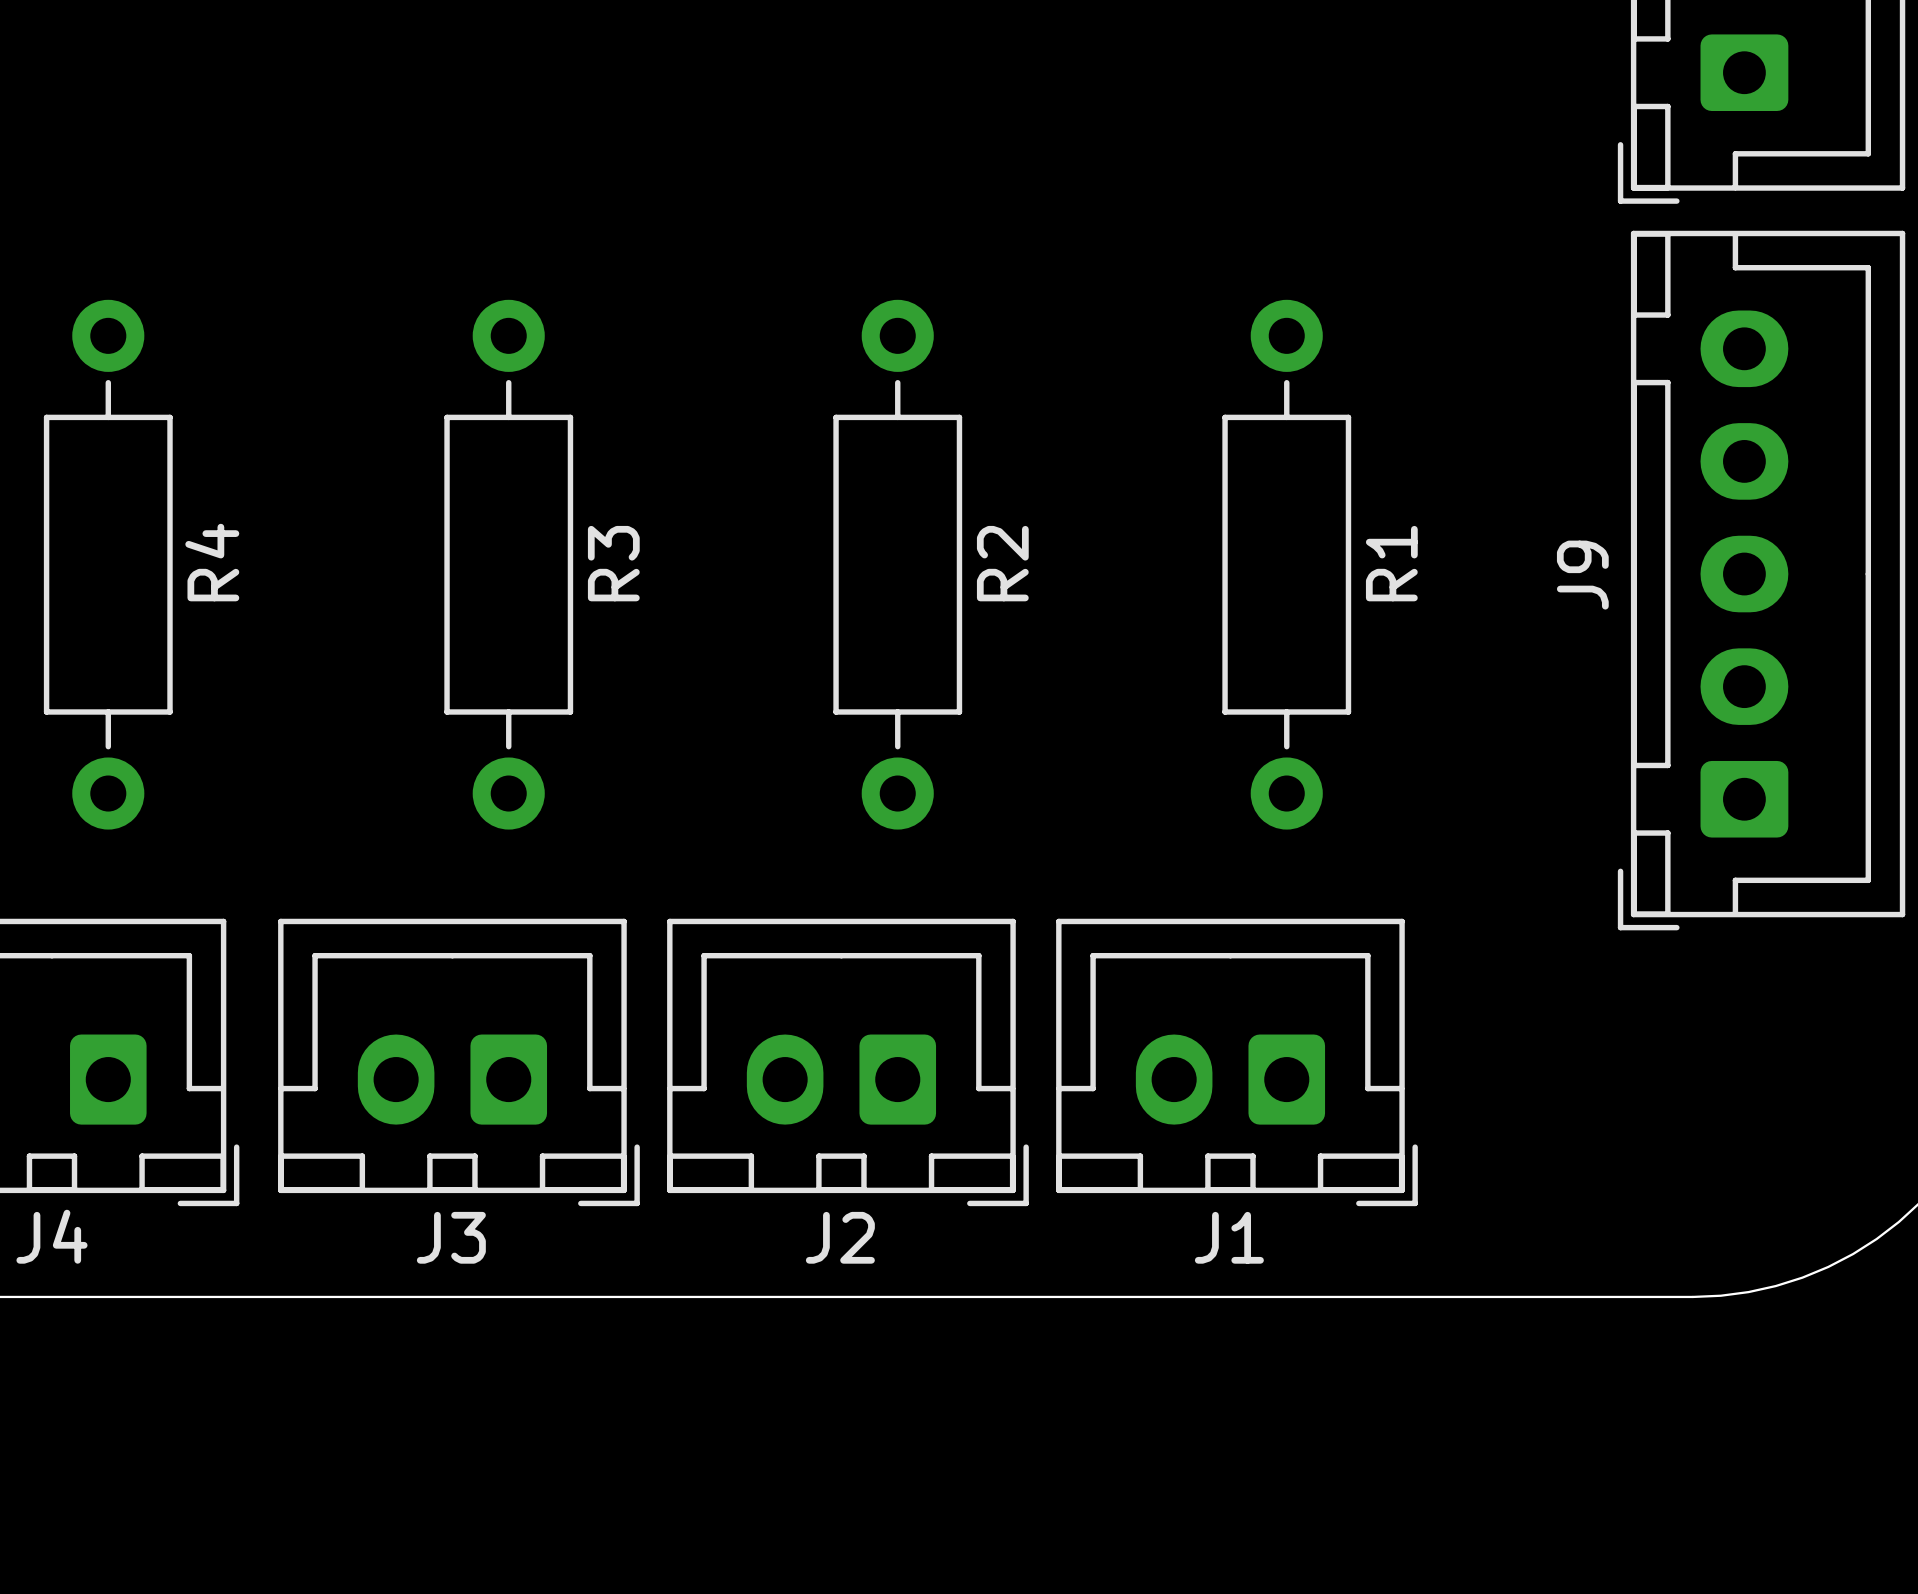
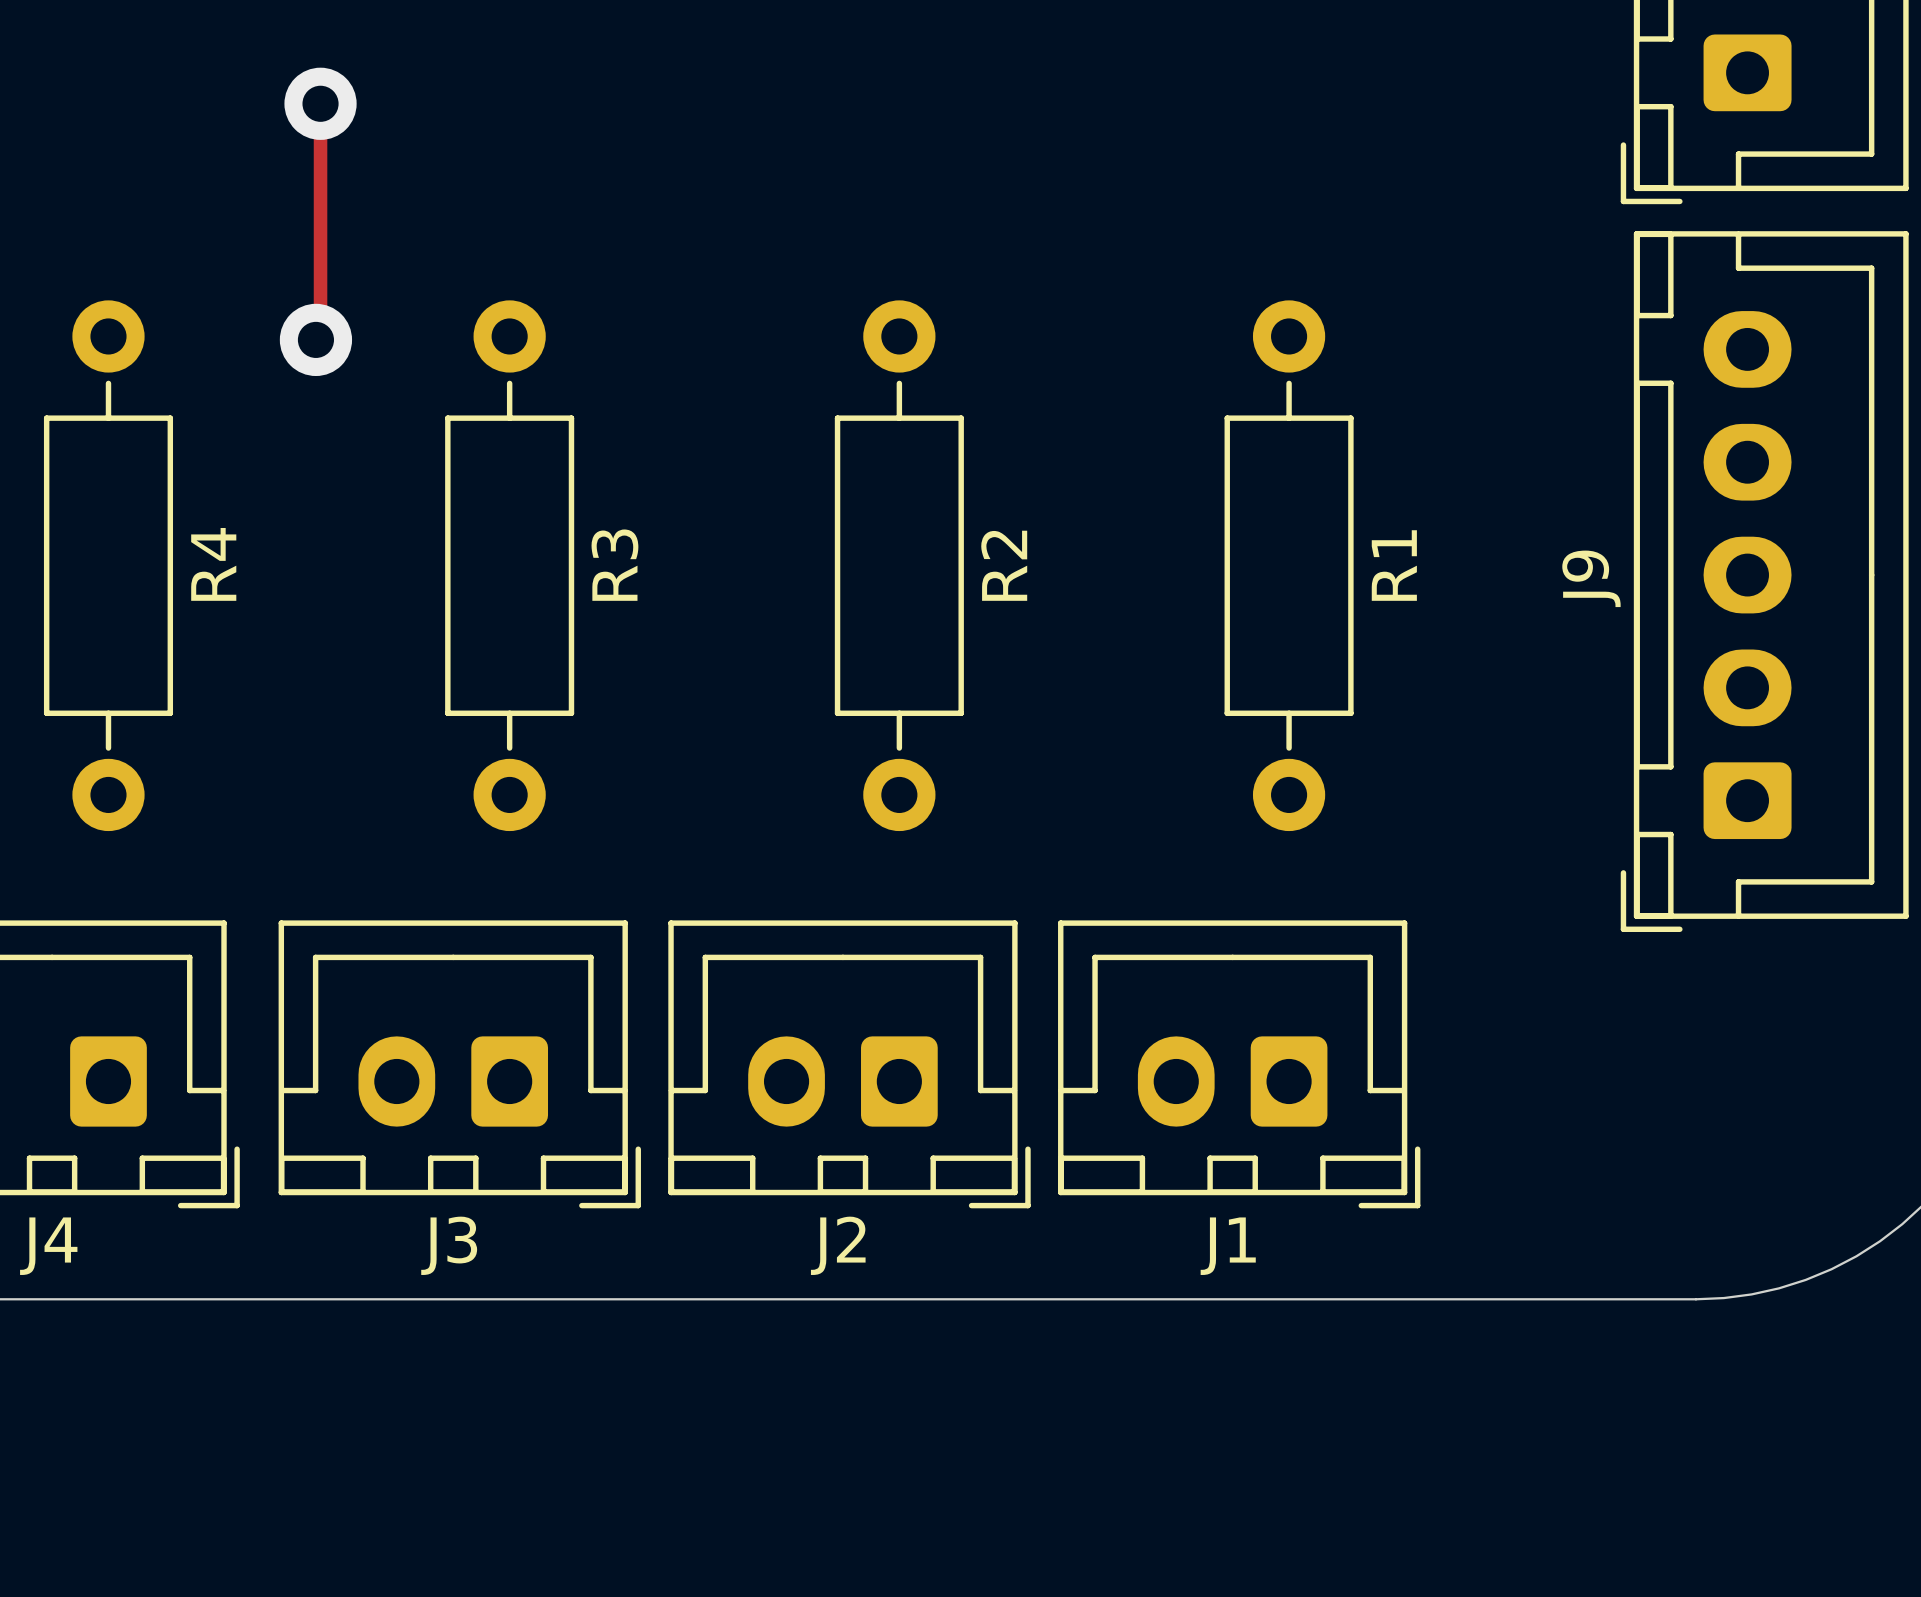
track: none -> (320, 103) (320, 335) (315, 339)
via: none -> (320, 103)
via: none -> (315, 339)

